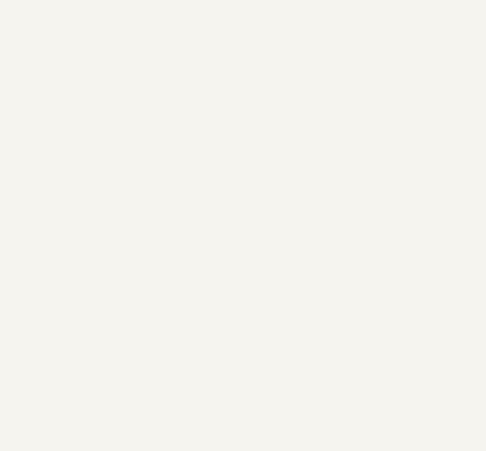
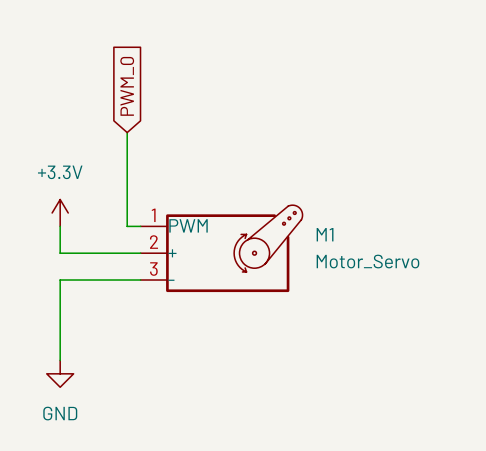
global label: none -> PWM_0 (127, 86)
wire: none -> (127, 132) (127, 226) (140, 226)
power symbol: none -> +3.3V (60, 212)
wire: none -> (60, 226) (60, 253) (140, 253)
M1: none -> Motor_Servo (221, 248)
wire: none -> (140, 280) (60, 280) (60, 360)
power symbol: none -> GND (60, 373)

